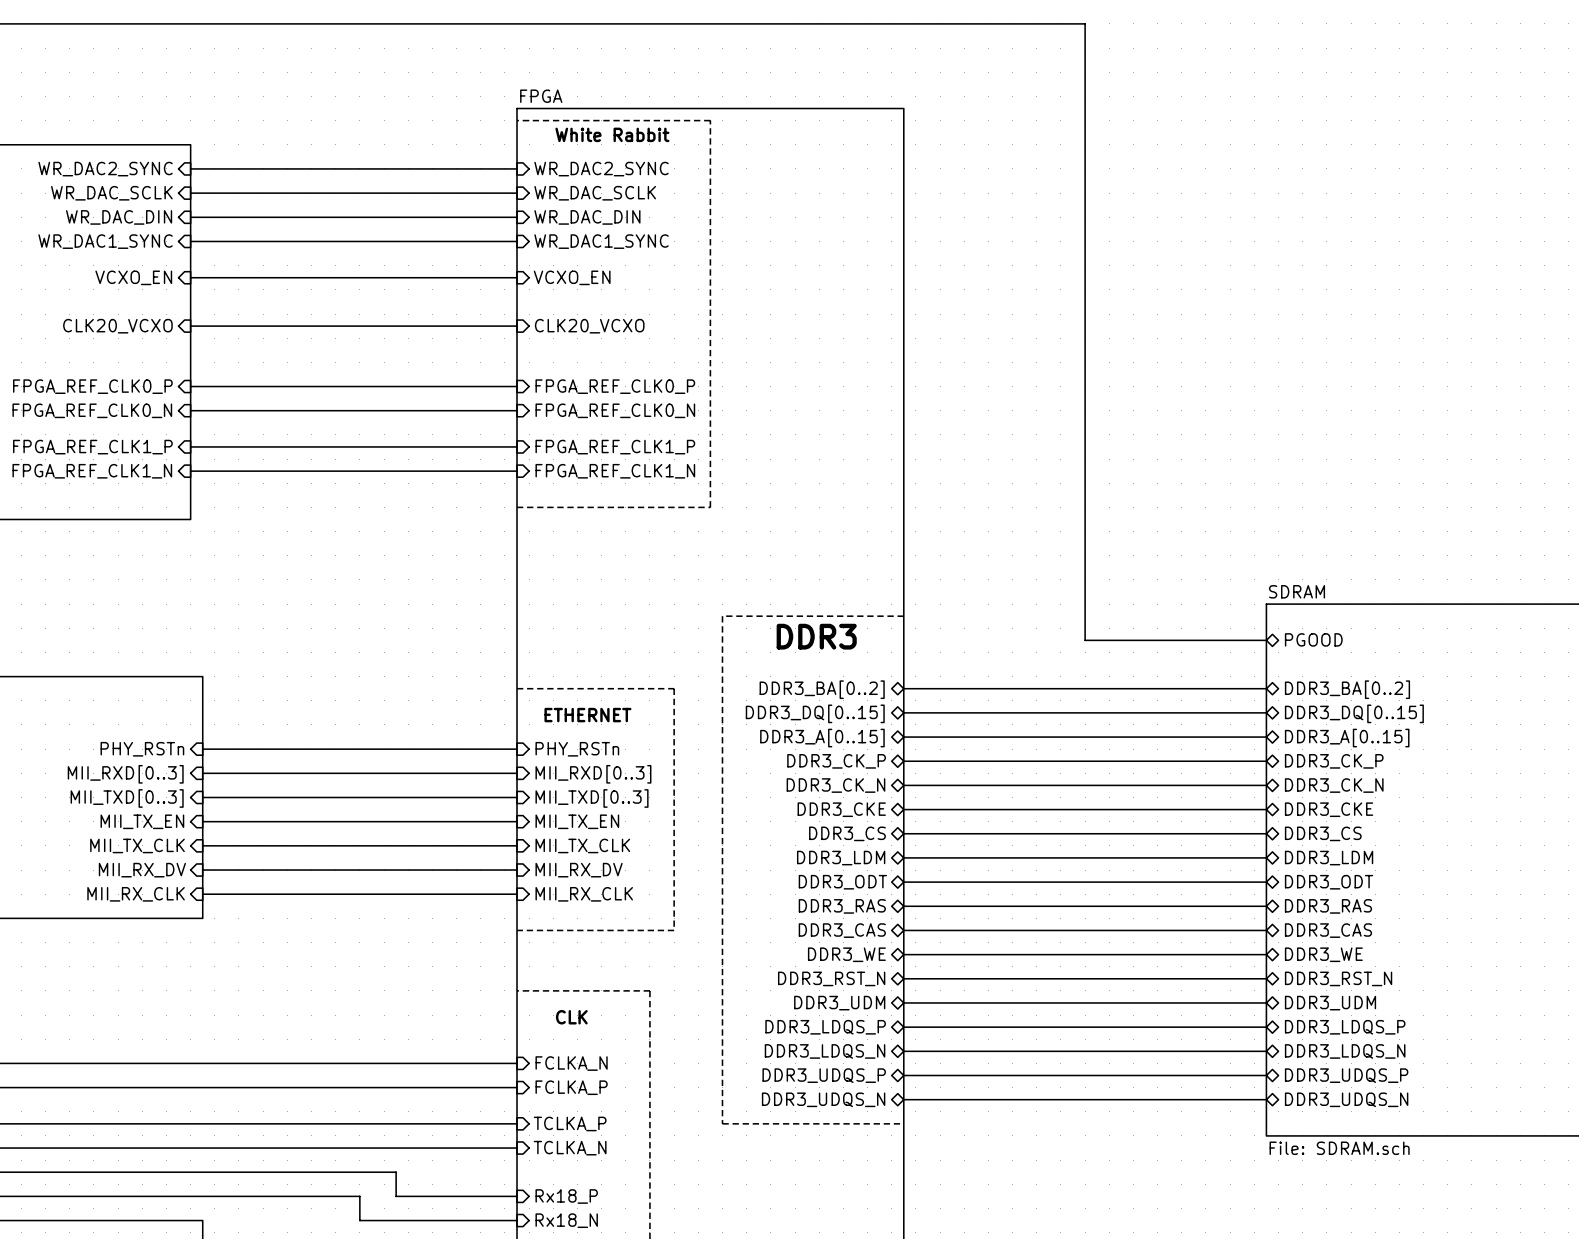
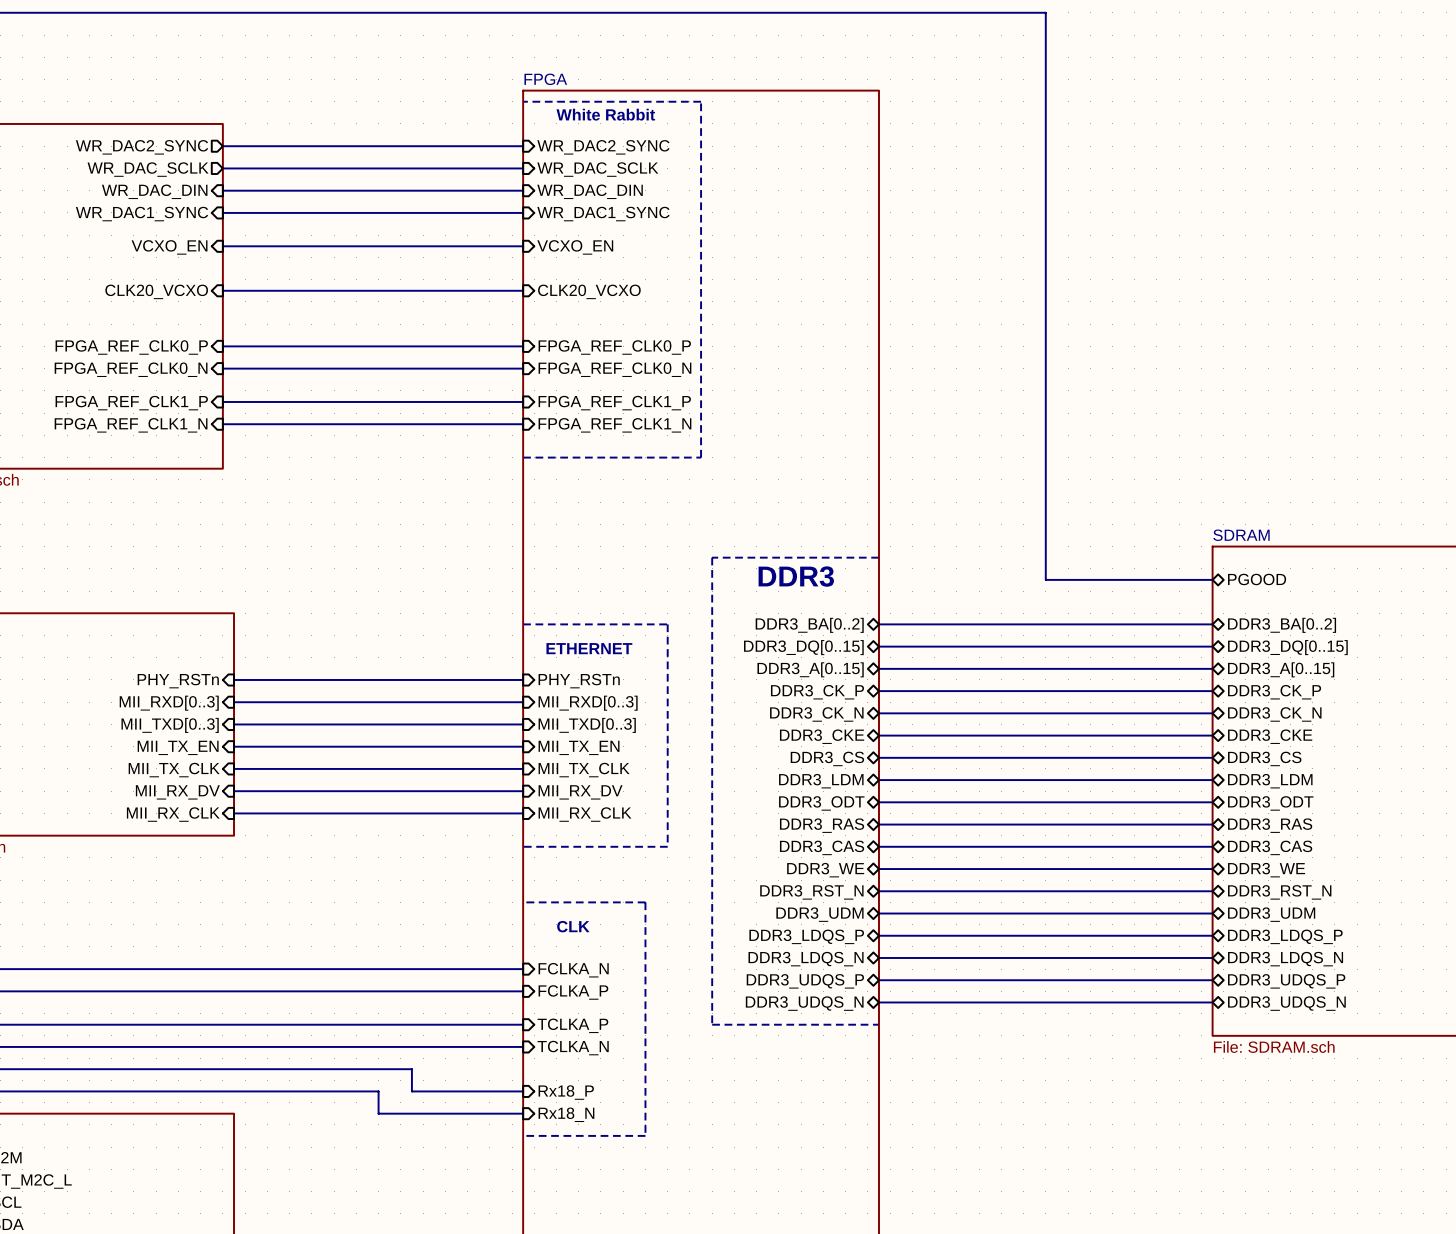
sheet pin shape: input (105, 169) -> output (142, 147)
sheet pin shape: input (111, 193) -> output (148, 169)

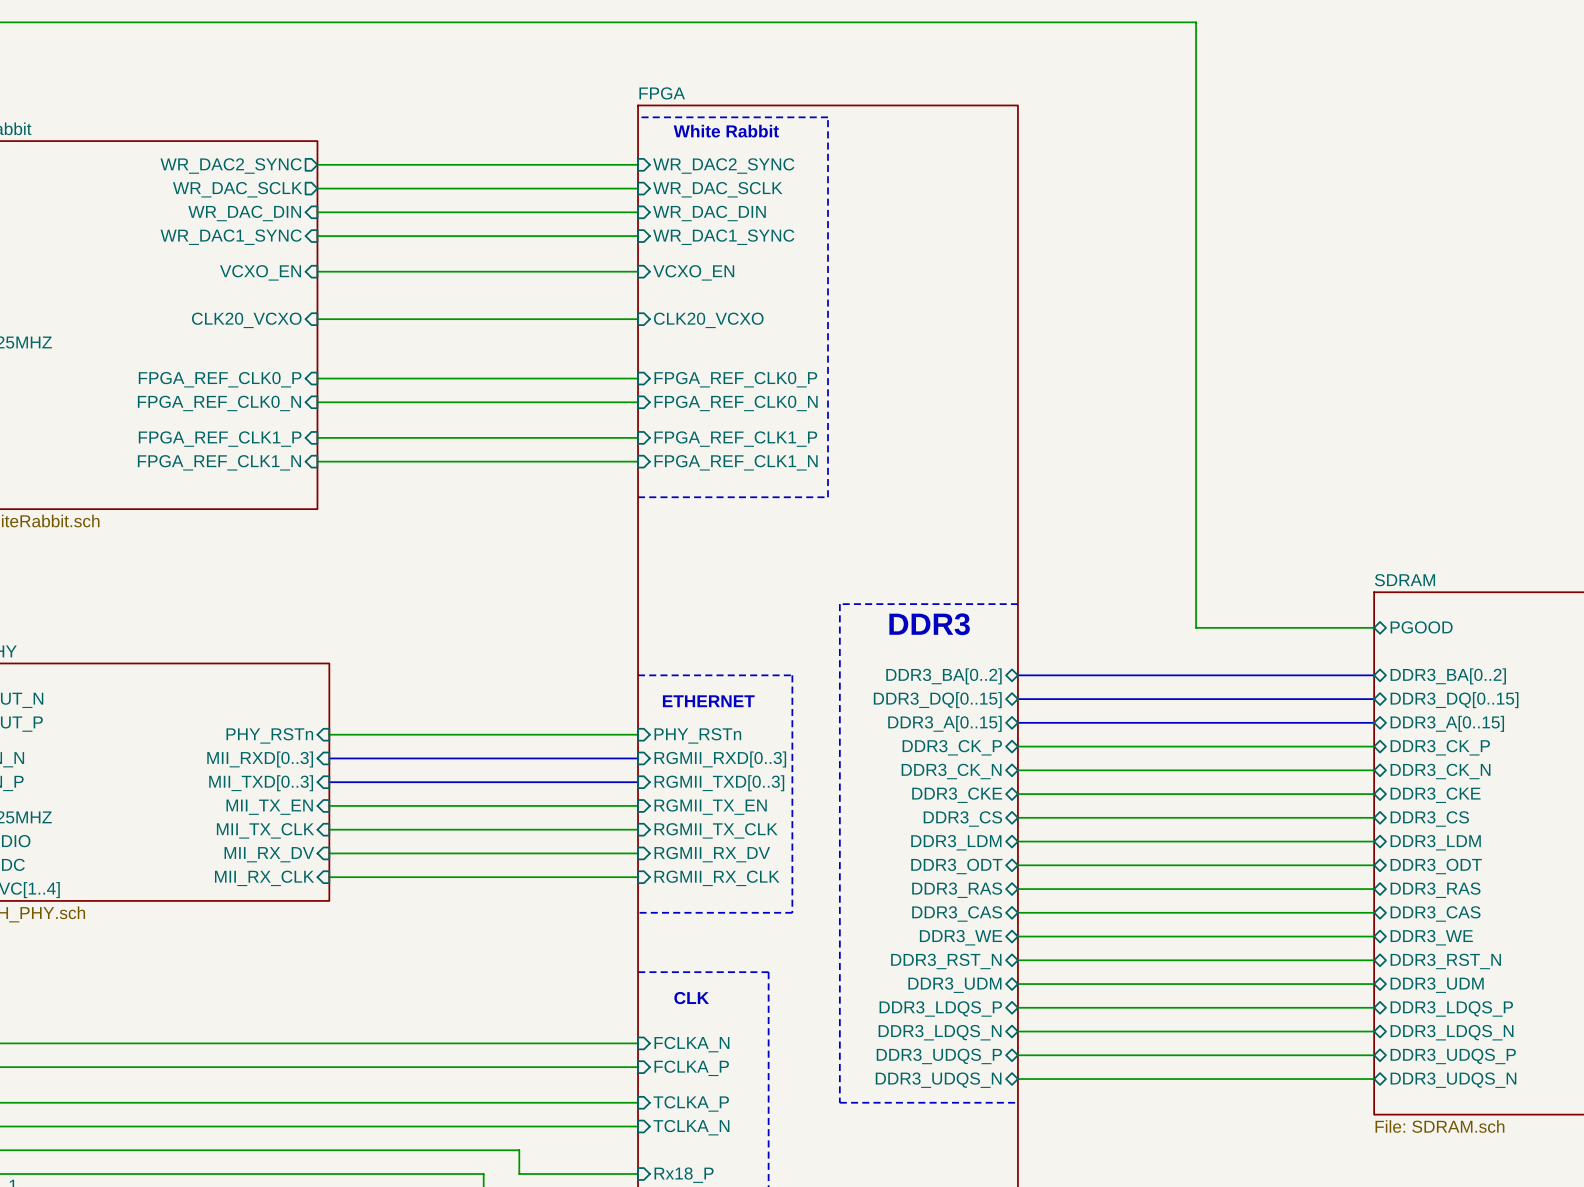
sheet pin: MII_RXD[0..3] (588, 703) -> RGMII_RXD[0..3] (720, 759)
sheet pin: MII_TXD[0..3] (587, 725) -> RGMII_TXD[0..3] (719, 783)
sheet pin: MII_TX_EN (579, 747) -> RGMII_TX_EN (710, 807)
sheet pin: MII_TX_CLK (584, 770) -> RGMII_TX_CLK (716, 830)
sheet pin: MII_RX_DV (580, 792) -> RGMII_RX_DV (712, 854)
sheet pin: MII_RX_CLK (585, 814) -> RGMII_RX_CLK (717, 878)

